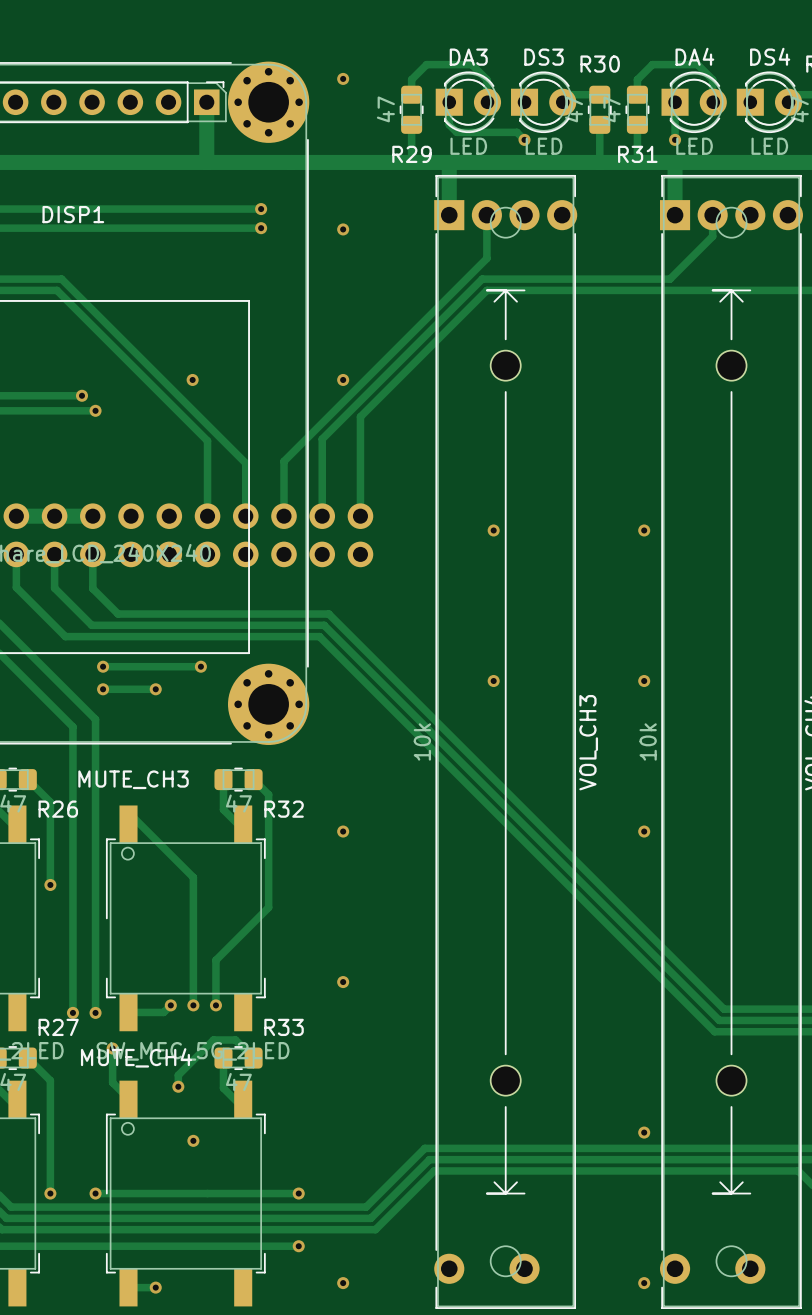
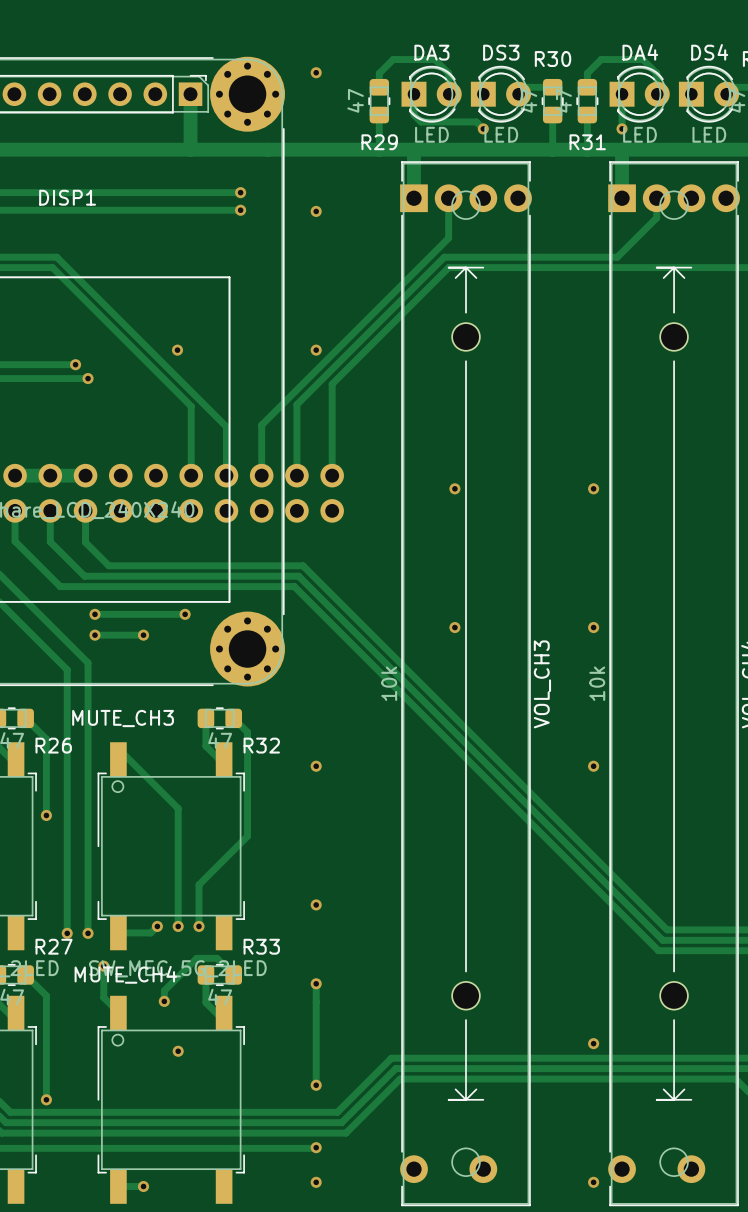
track: none -> (316, 983) (316, 1085)
via: none -> (316, 983)
via: none -> (316, 1085)
track: (95, 1193) (298, 1193) -> none
via: (95, 1193) -> none
via: (298, 1193) -> none
track: none -> (316, 1147) (275, 1148)
via: none -> (316, 1147)
via: (298, 1246) -> none

